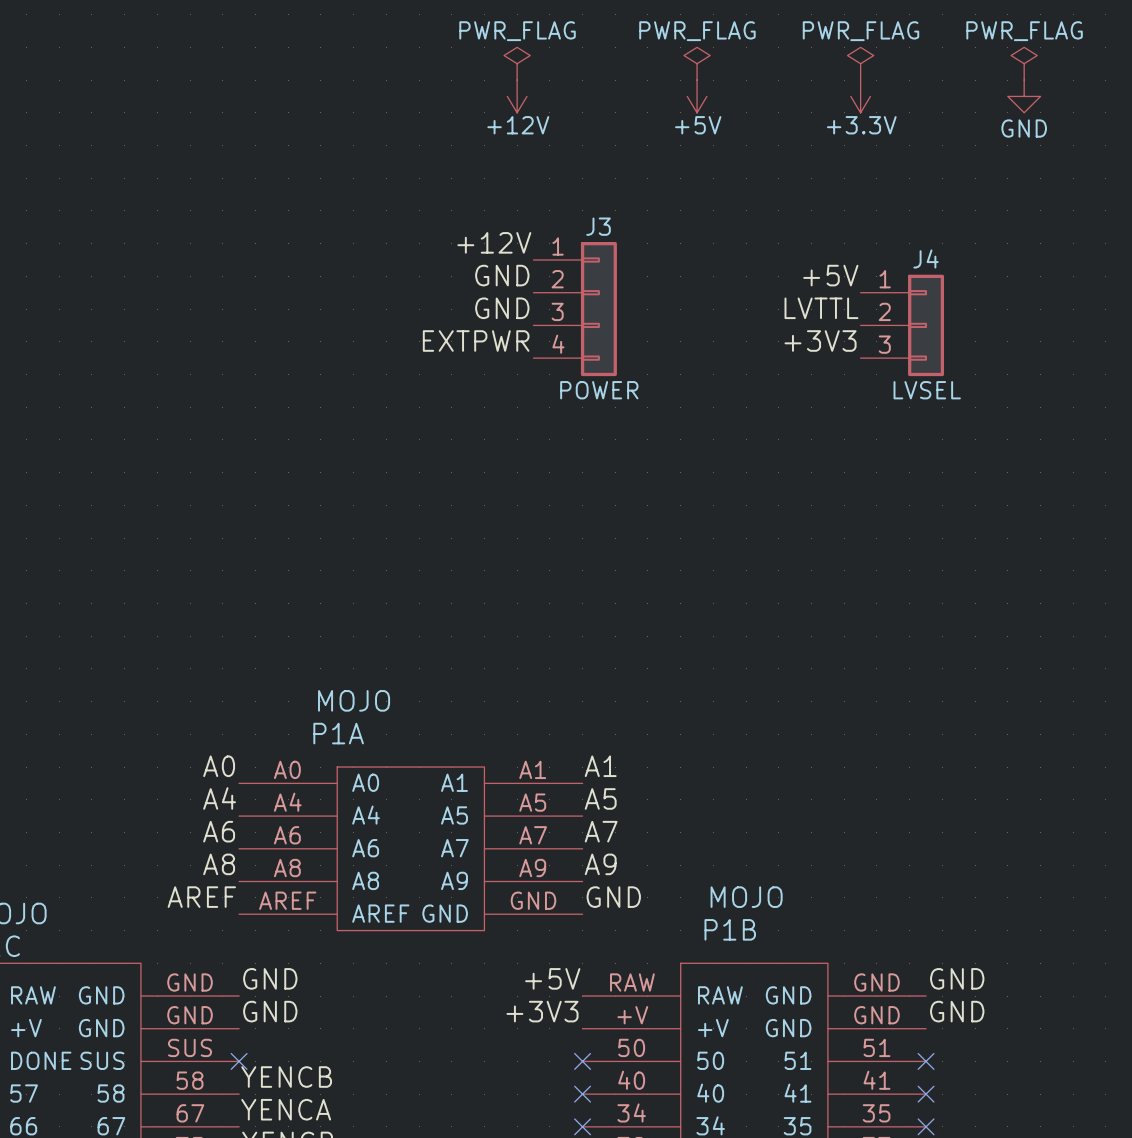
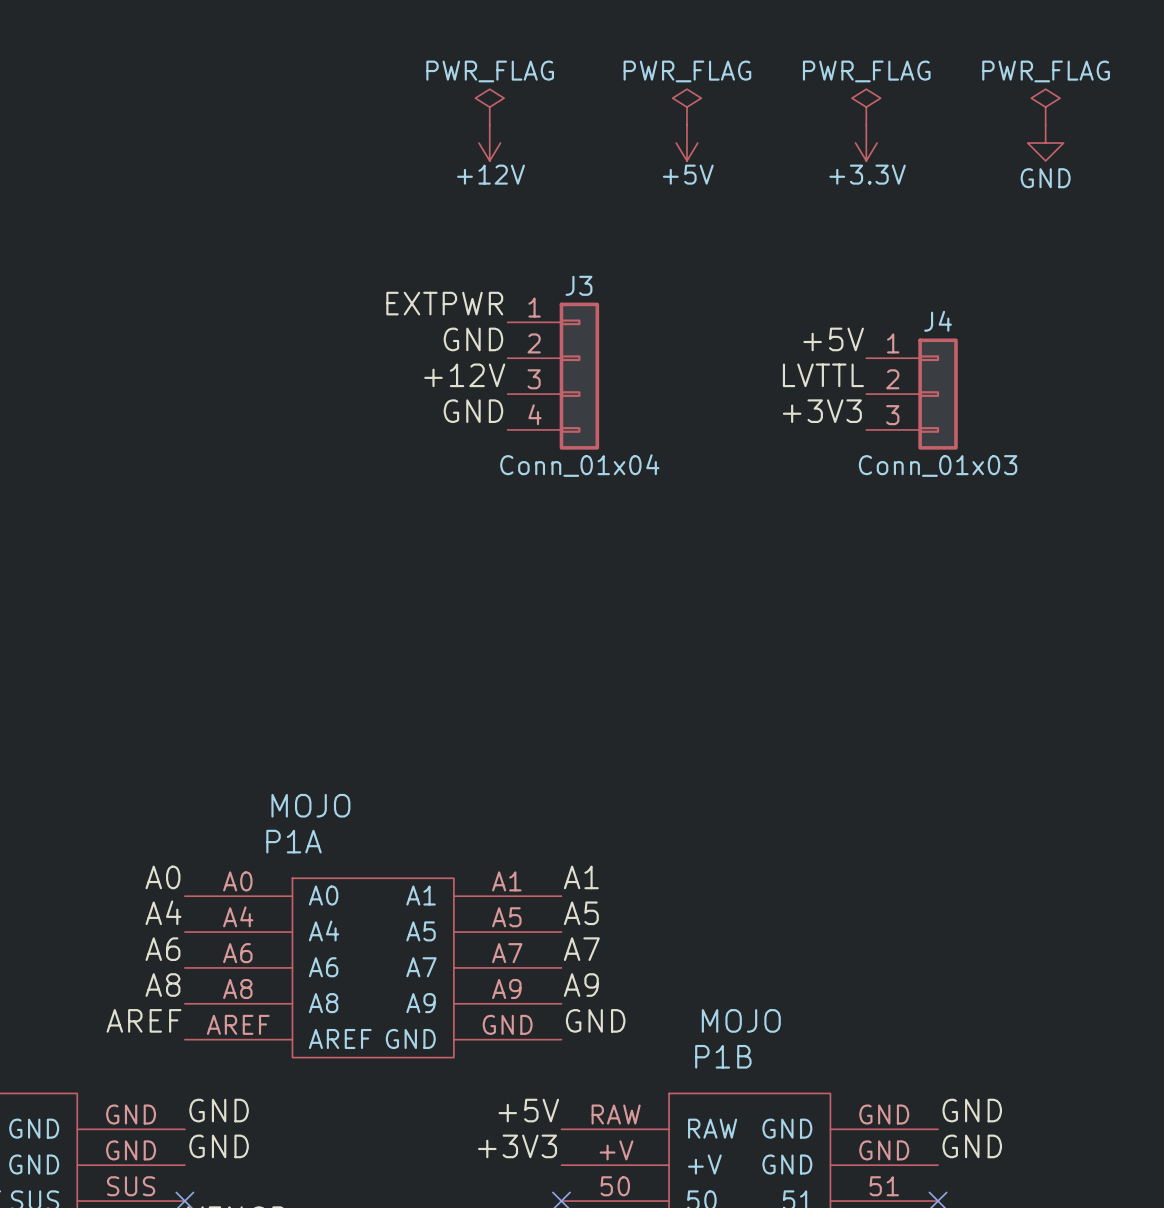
label: +12V (494, 242) -> EXTPWR (444, 303)
label: GND (502, 308) -> +12V (464, 375)
label: EXTPWR (476, 341) -> GND (473, 411)
J3 value: POWER (599, 390) -> Conn_01x04 (579, 465)
J4 value: LVSEL (927, 390) -> Conn_01x03 (938, 465)

